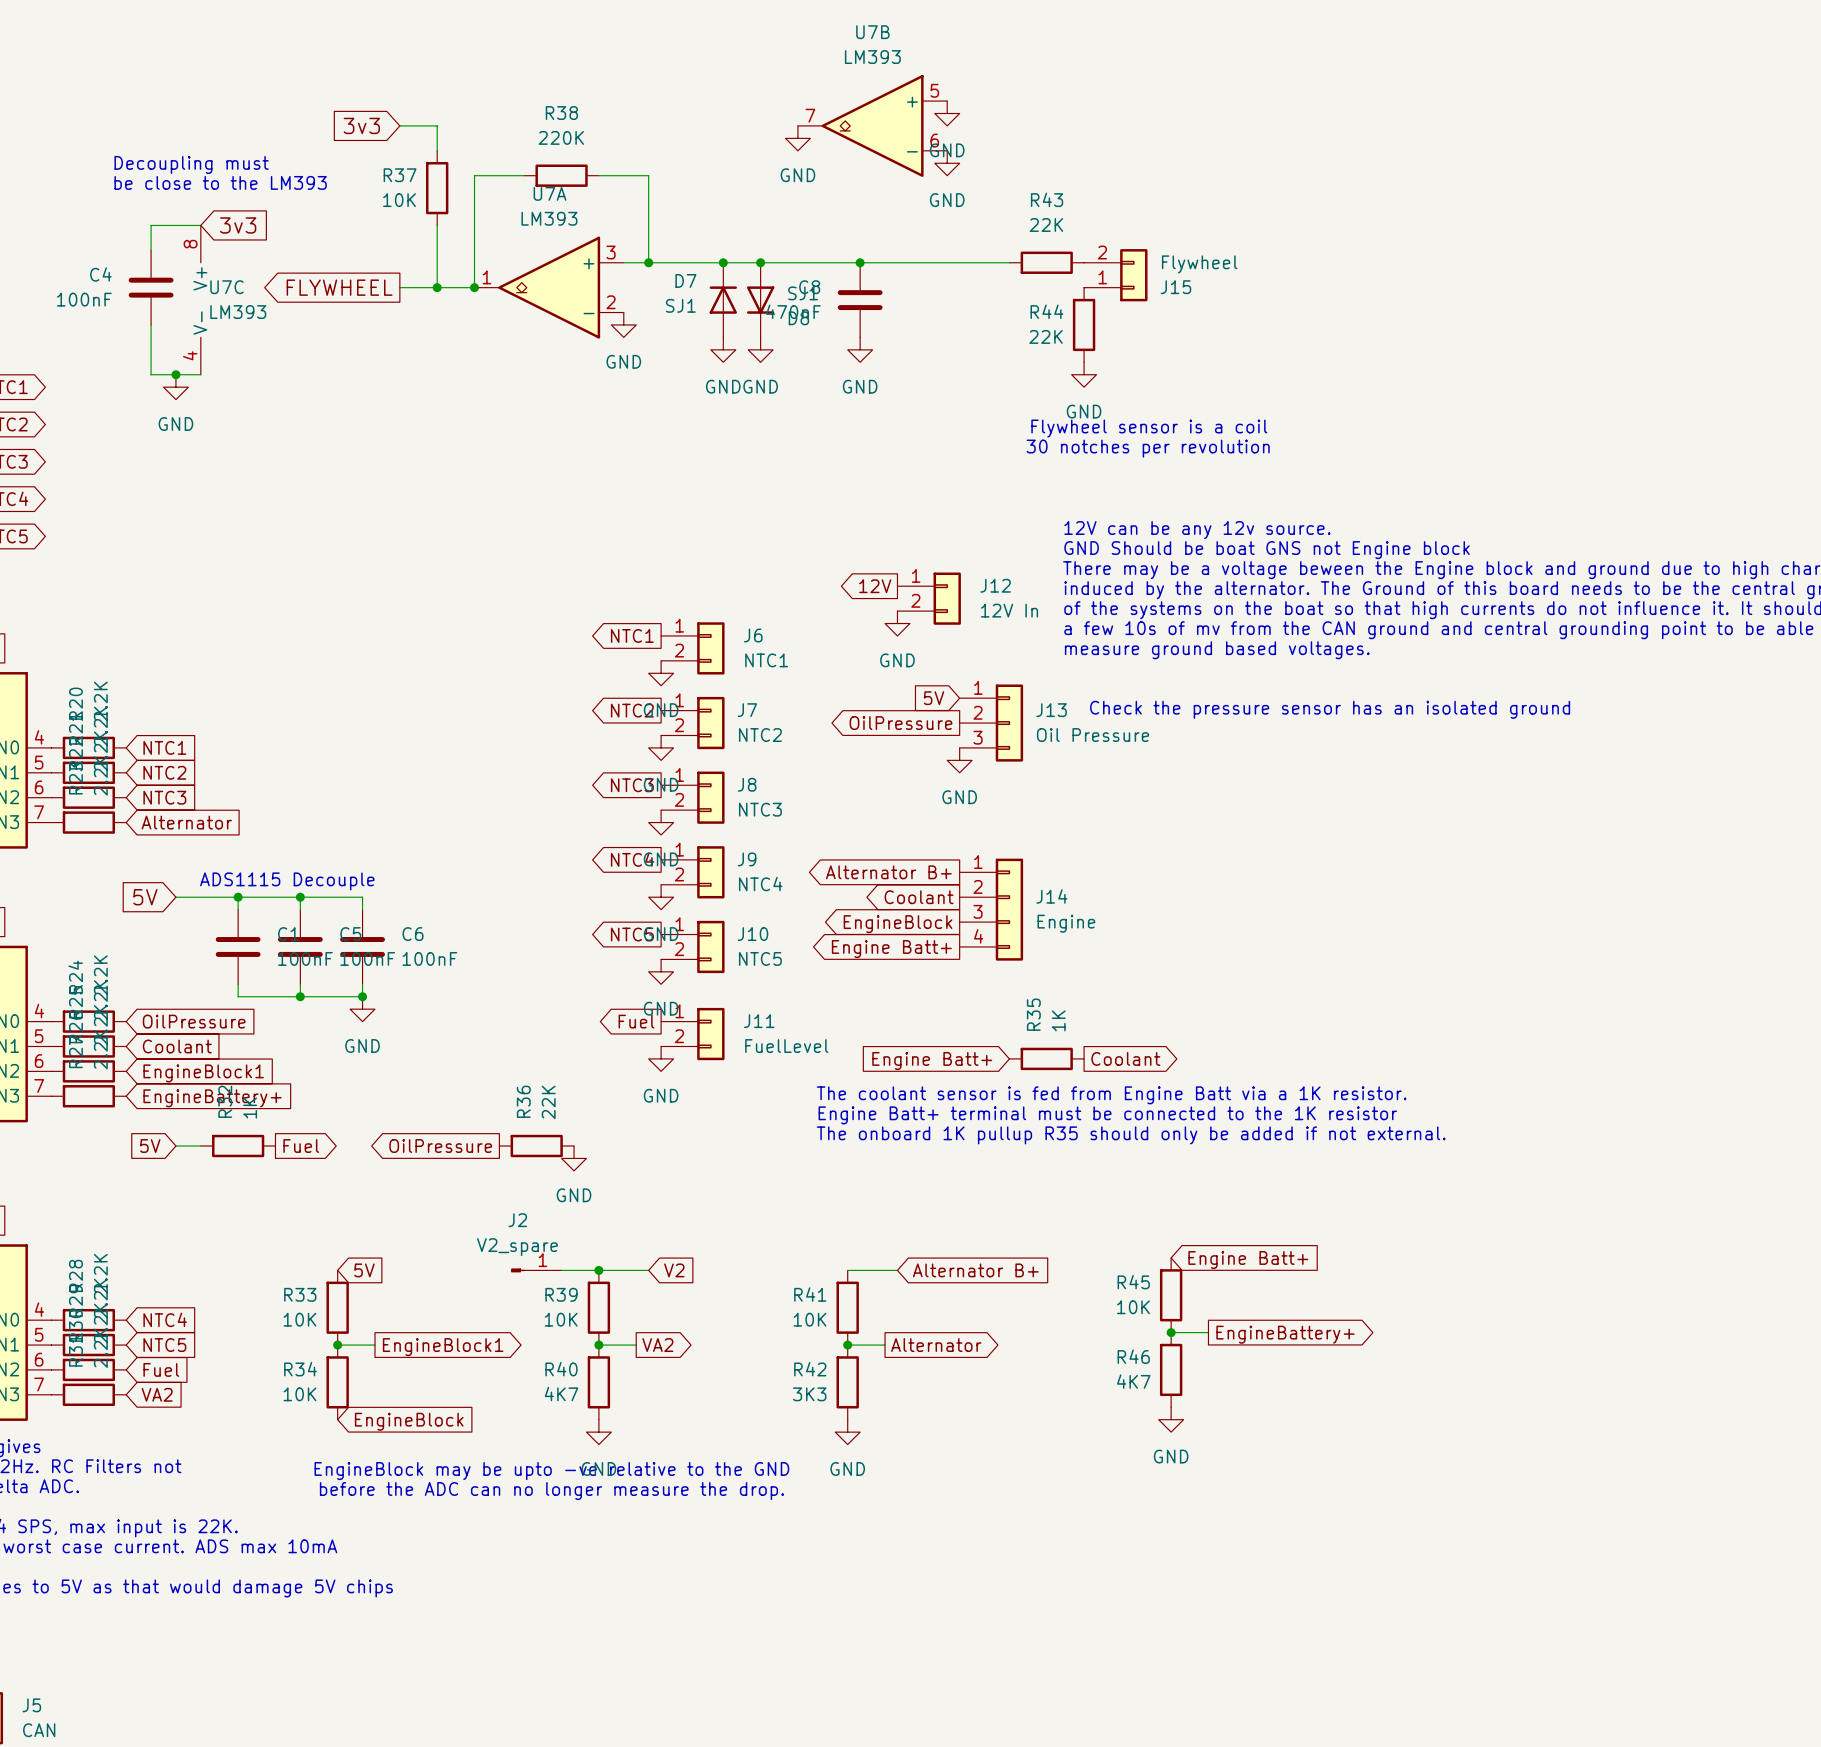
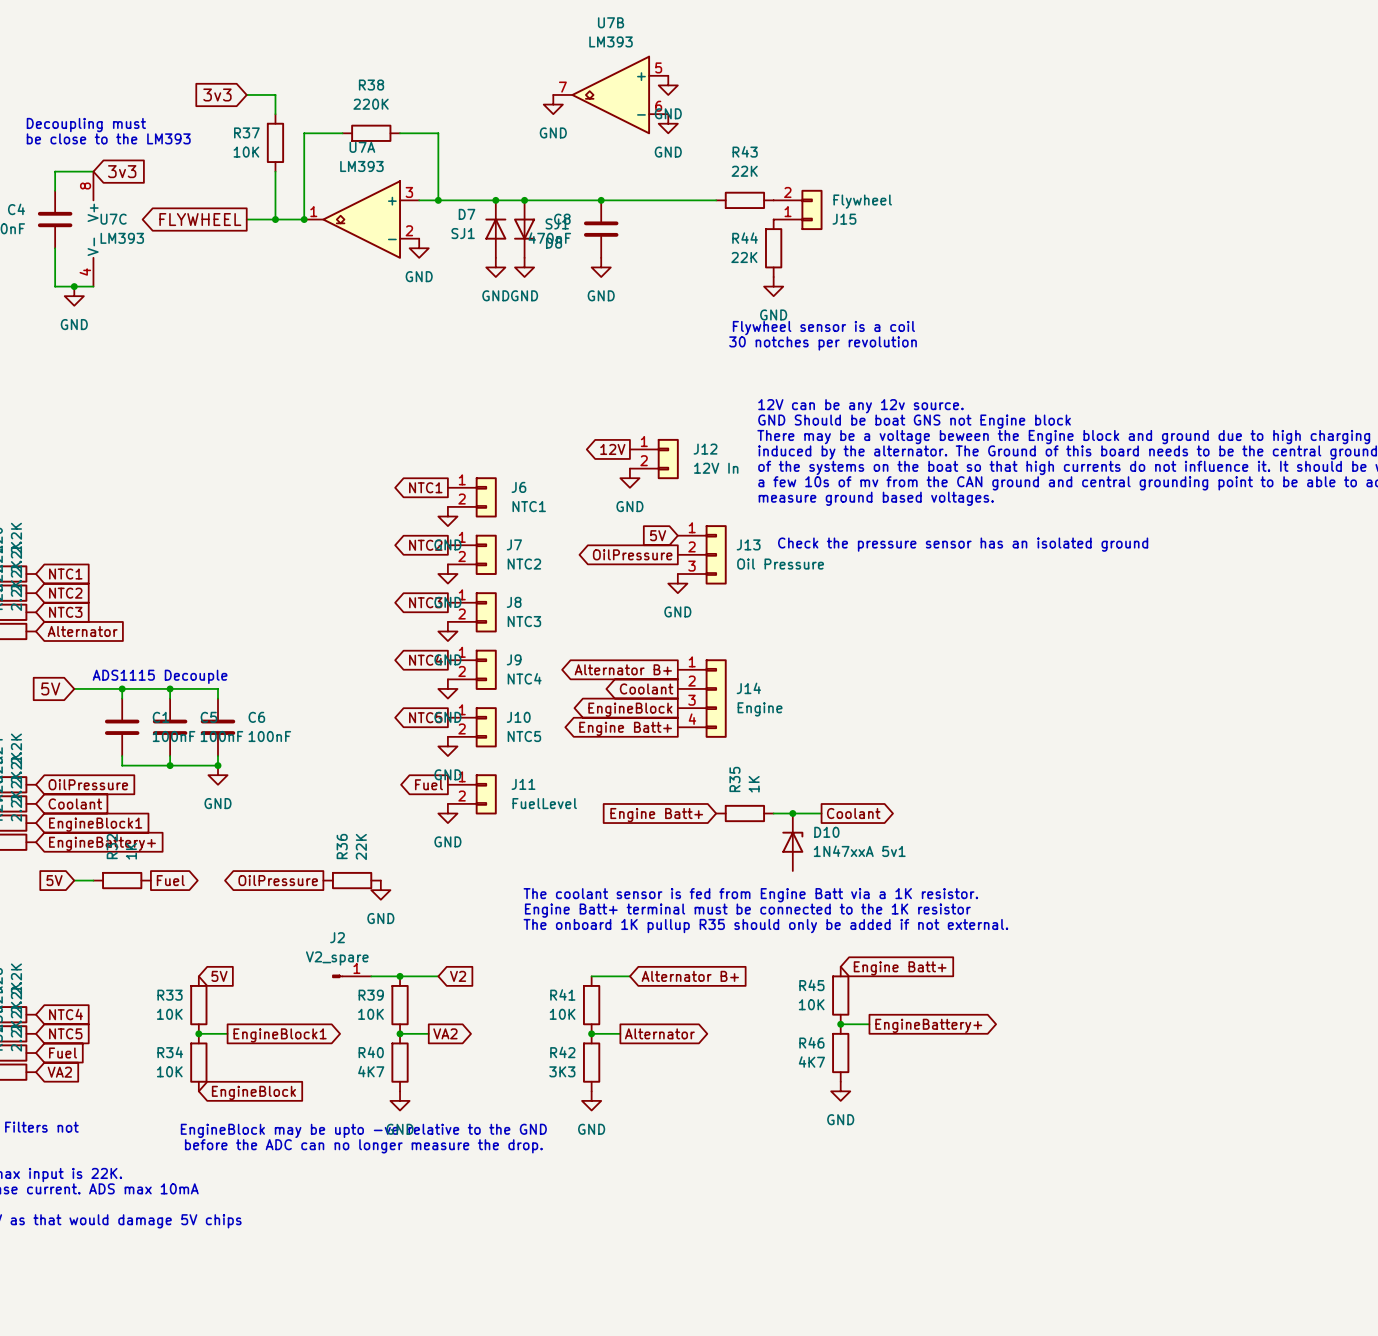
wire: none -> (773, 813) (821, 813)
junction: none -> (792, 813)
global label position: Coolant (1125, 1058) -> Coolant (853, 813)
text position: The coolant sensor is fed from Engine Batt via a 1K resistor. (1111, 1095) -> The coolant sensor is fed from Engine Batt via a 1K resistor. (750, 895)
D10: none -> 1N47xxA 5v1 (792, 842)
text position: Engine Batt+ terminal must be connected to the 1K resistor (1107, 1115) -> Engine Batt+ terminal must be connected to the 1K resistor (747, 910)
text position: The onboard 1K pullup R35 should only be added if not external. (1131, 1135) -> The onboard 1K pullup R35 should only be added if not external. (765, 926)

